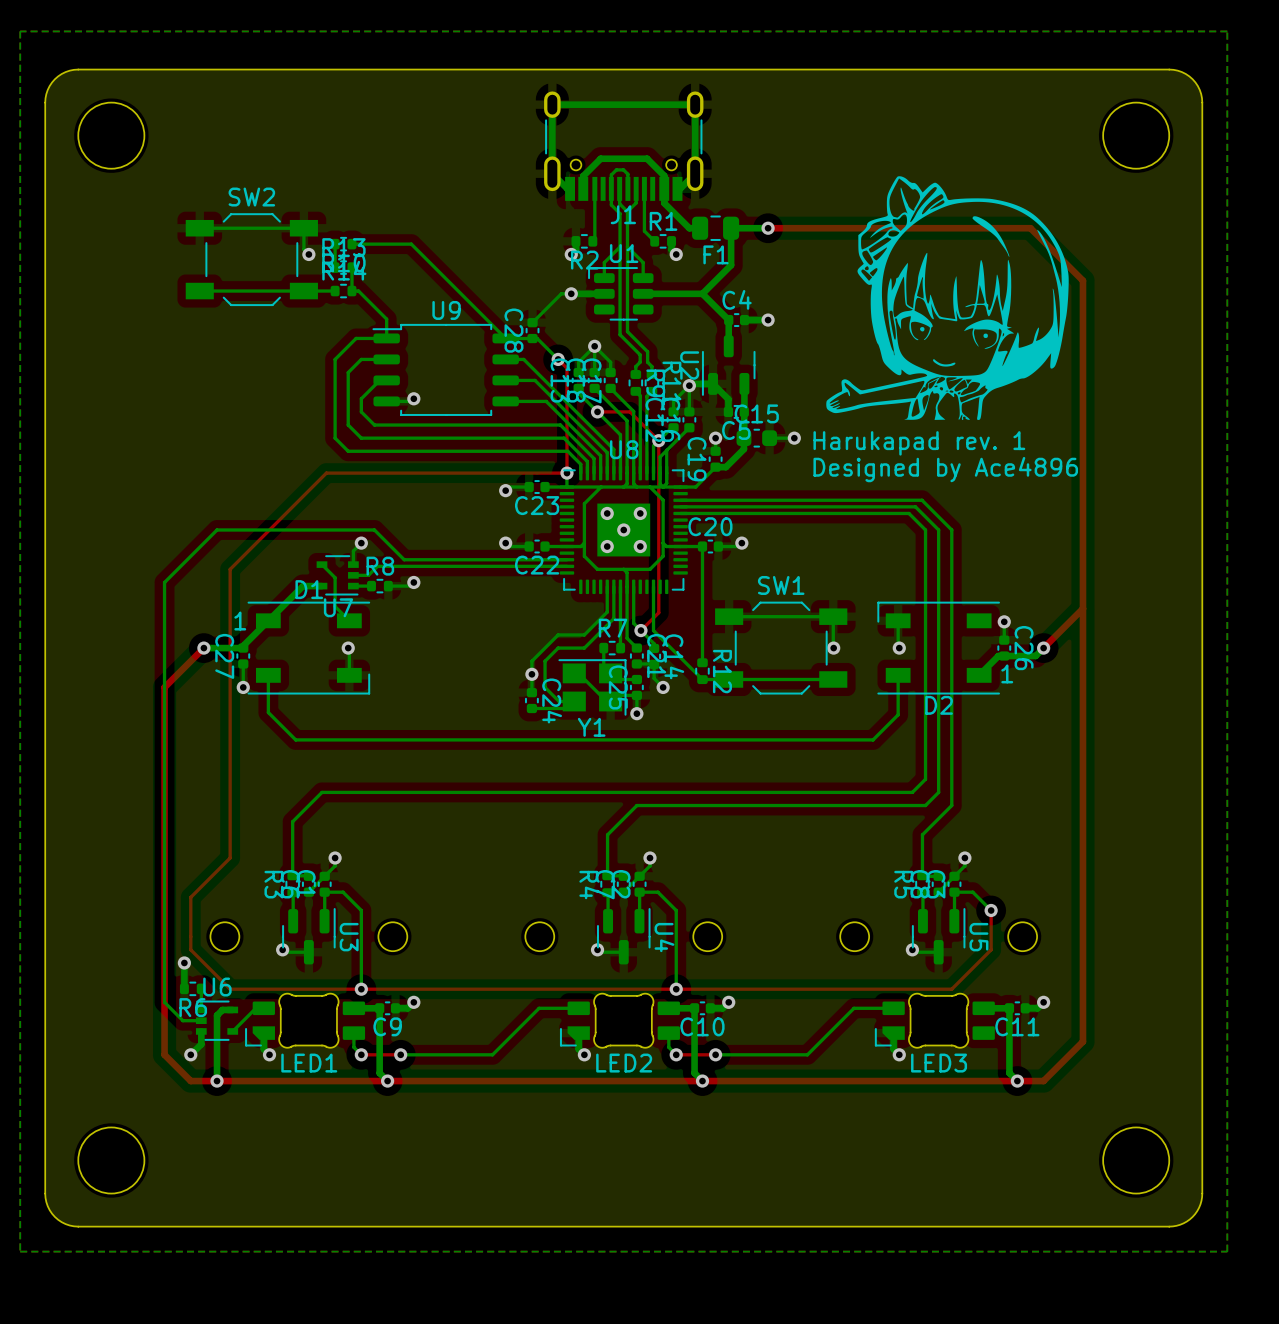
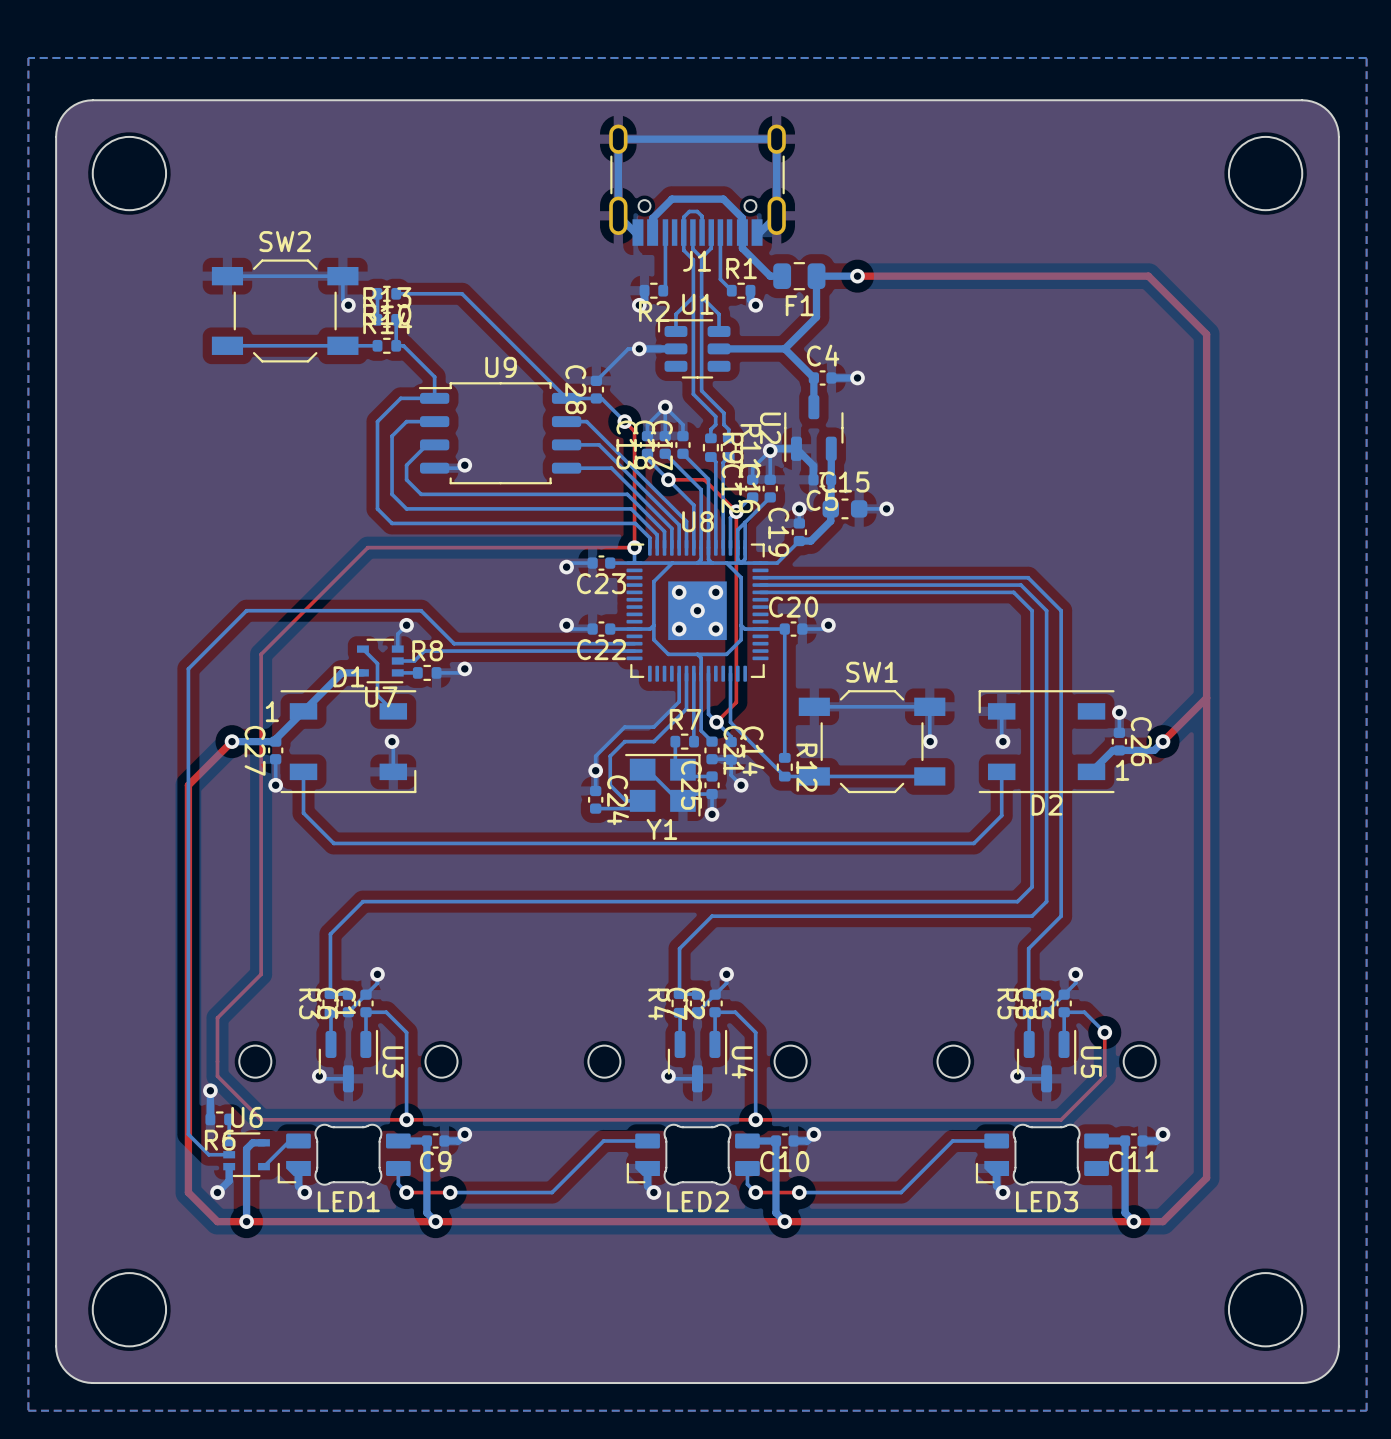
drawing: [826, 176, 1069, 420] -> none
text: Harukapad rev. 1 (919, 443) -> none
text: Designed by Ace4896 (945, 469) -> none

